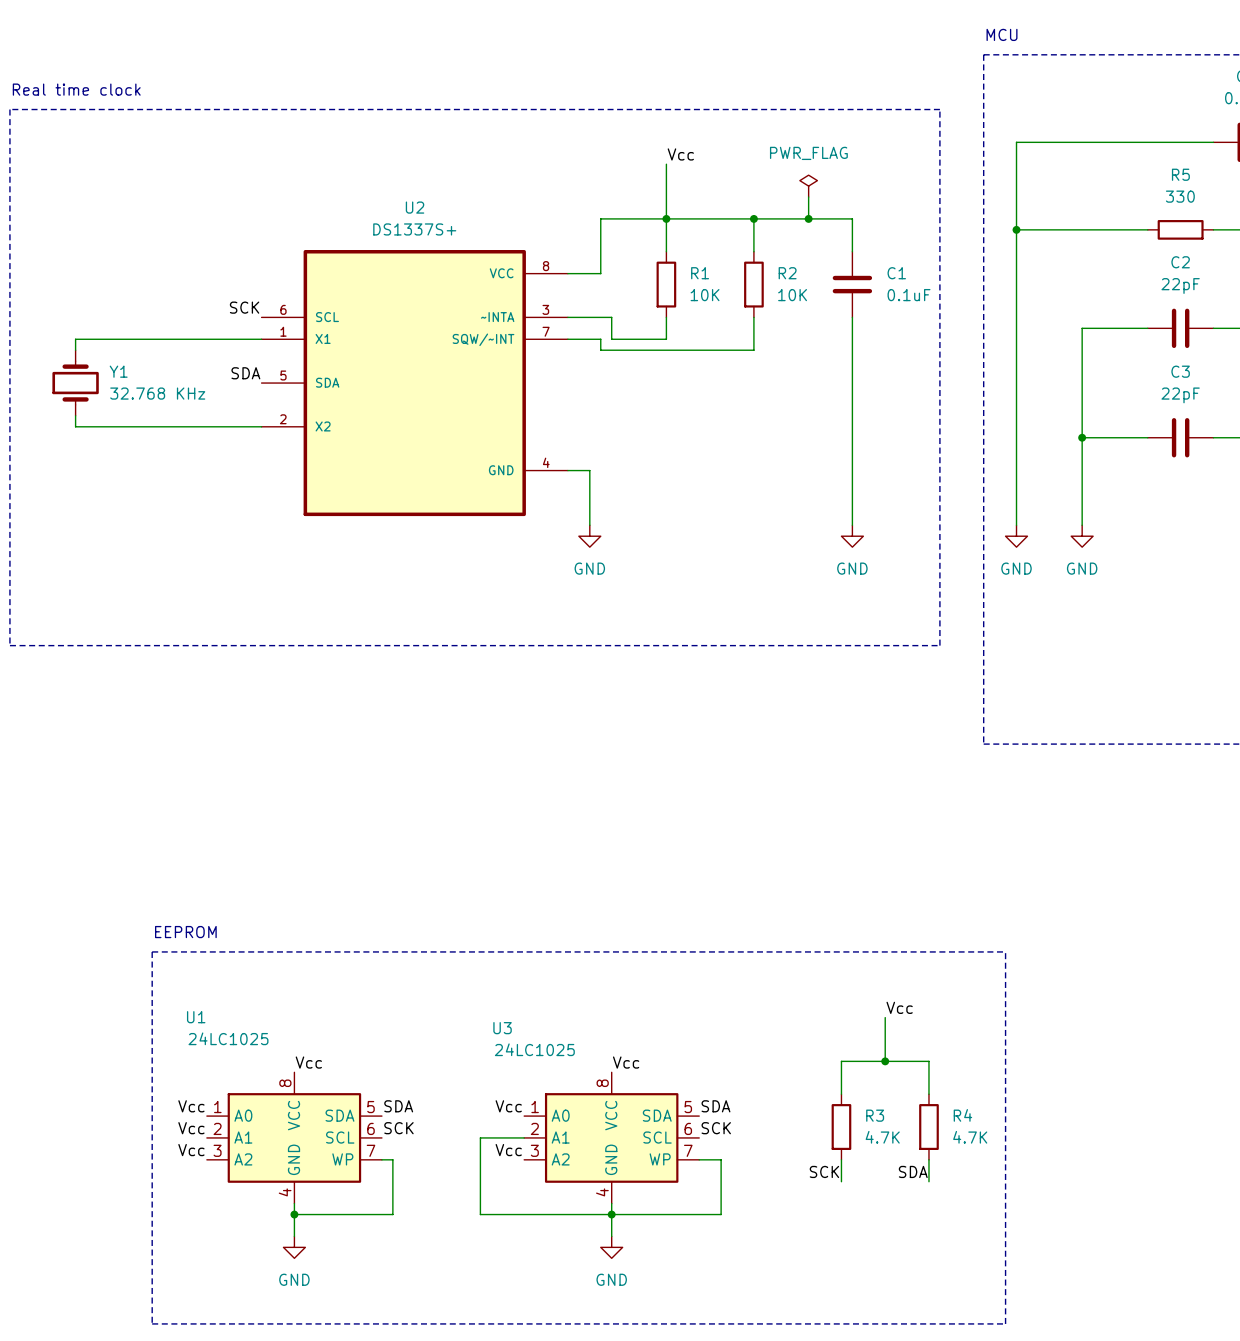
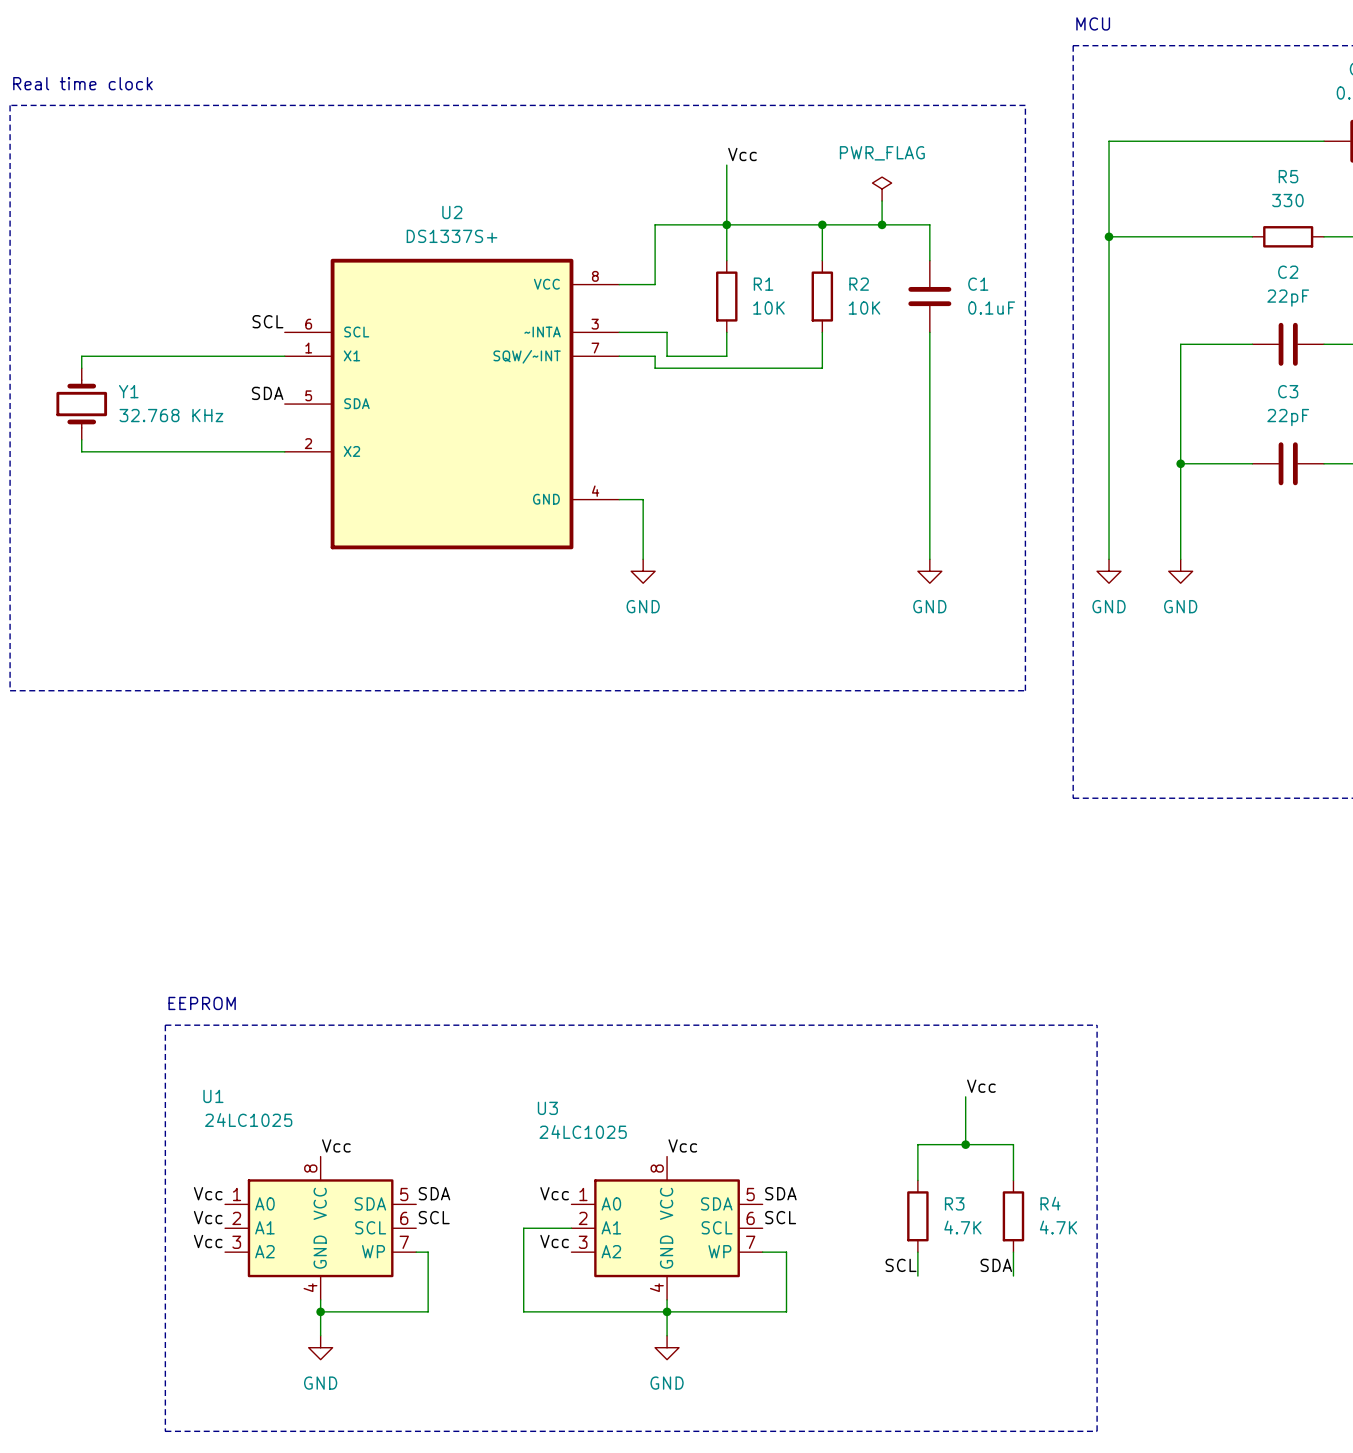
label: SCK (244, 307) -> SCL (267, 321)
label: SCK (398, 1128) -> SCL (434, 1217)
label: SCK (716, 1128) -> SCL (780, 1217)
label: SCK (824, 1171) -> SCL (901, 1265)

